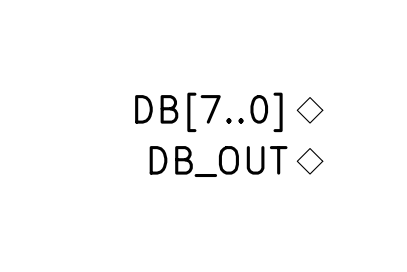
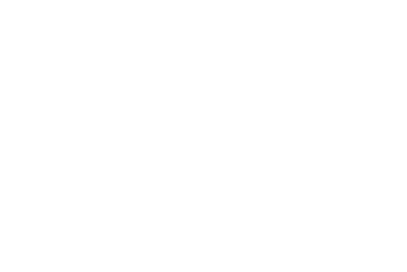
hierarchical label: DB[7..0] (208, 112) -> none
hierarchical label: DB_OUT (218, 161) -> none

